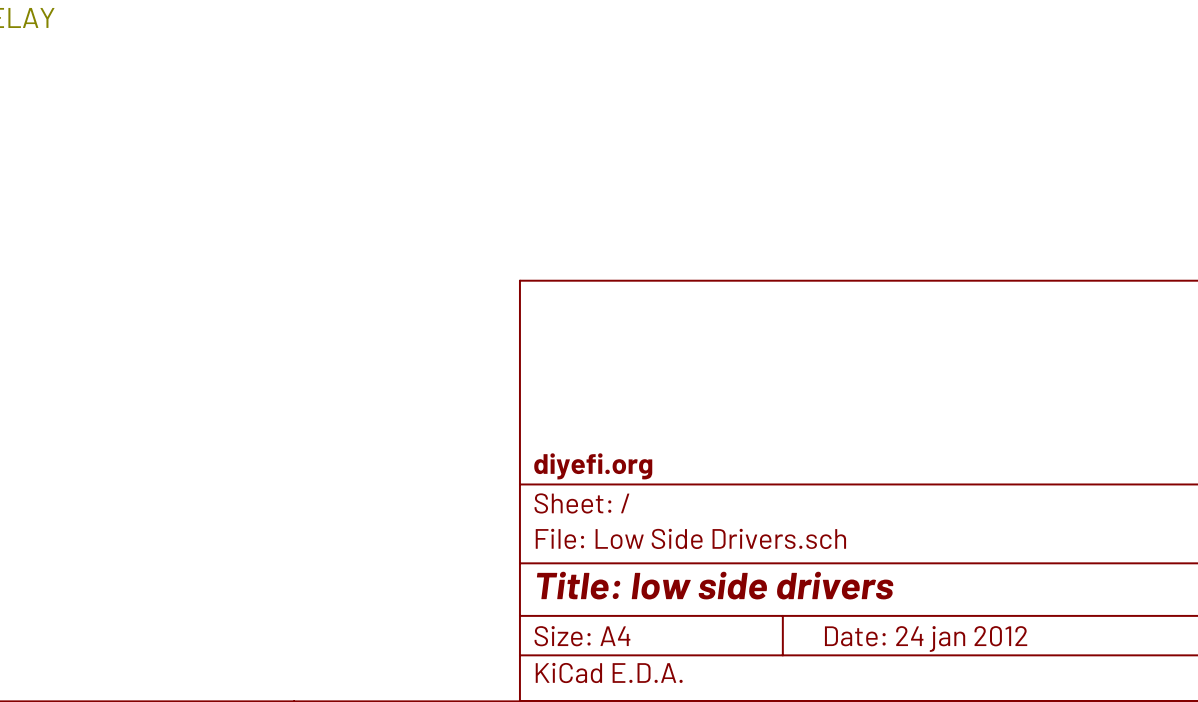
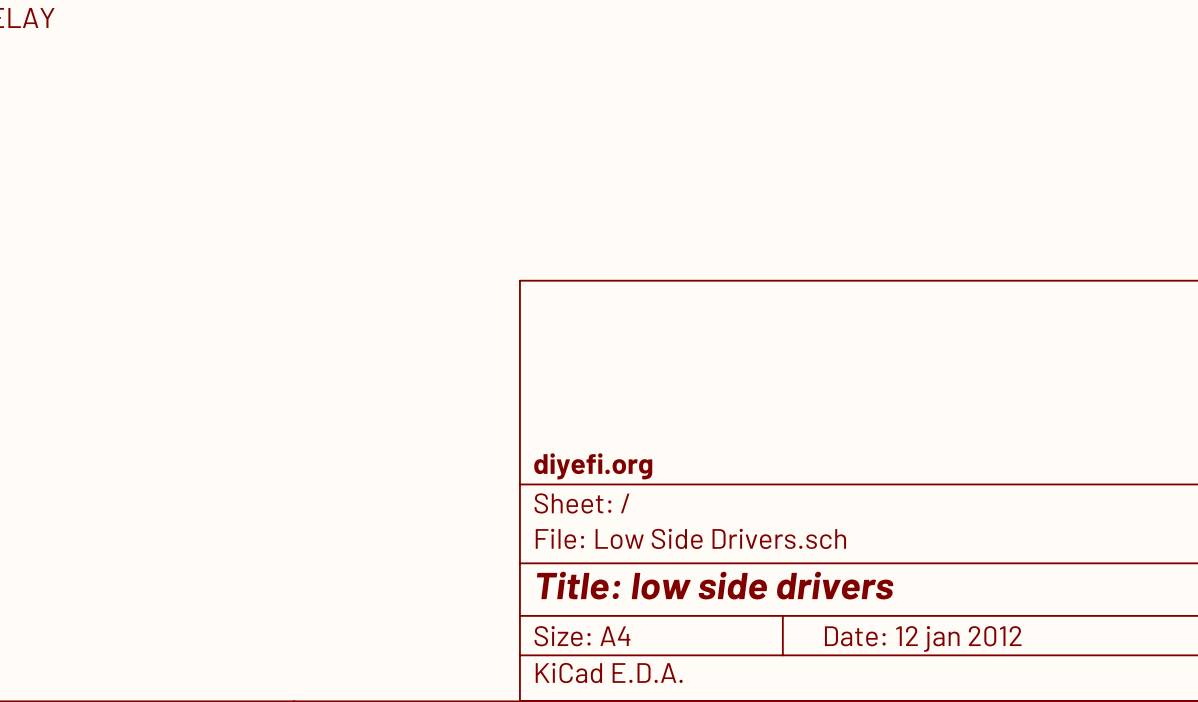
title block: Date: 24 jan 2012 (926, 638) -> Date: 12 jan 2012 (923, 638)

